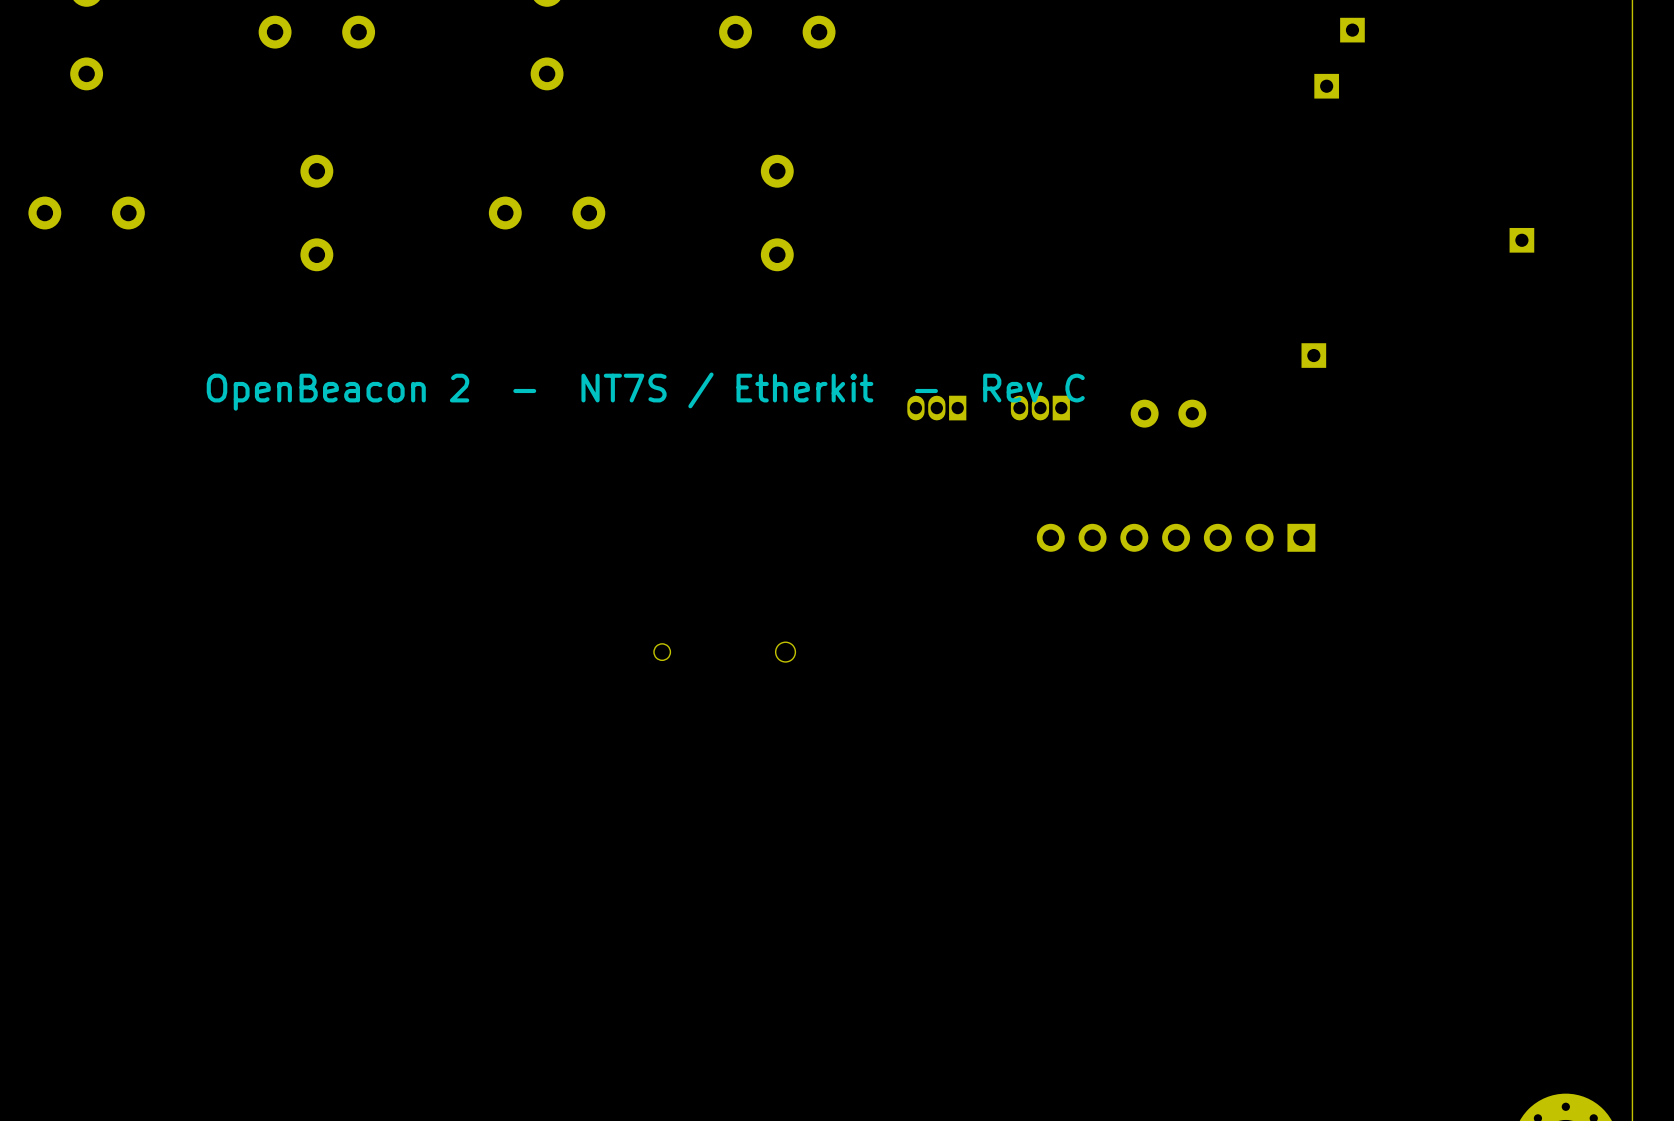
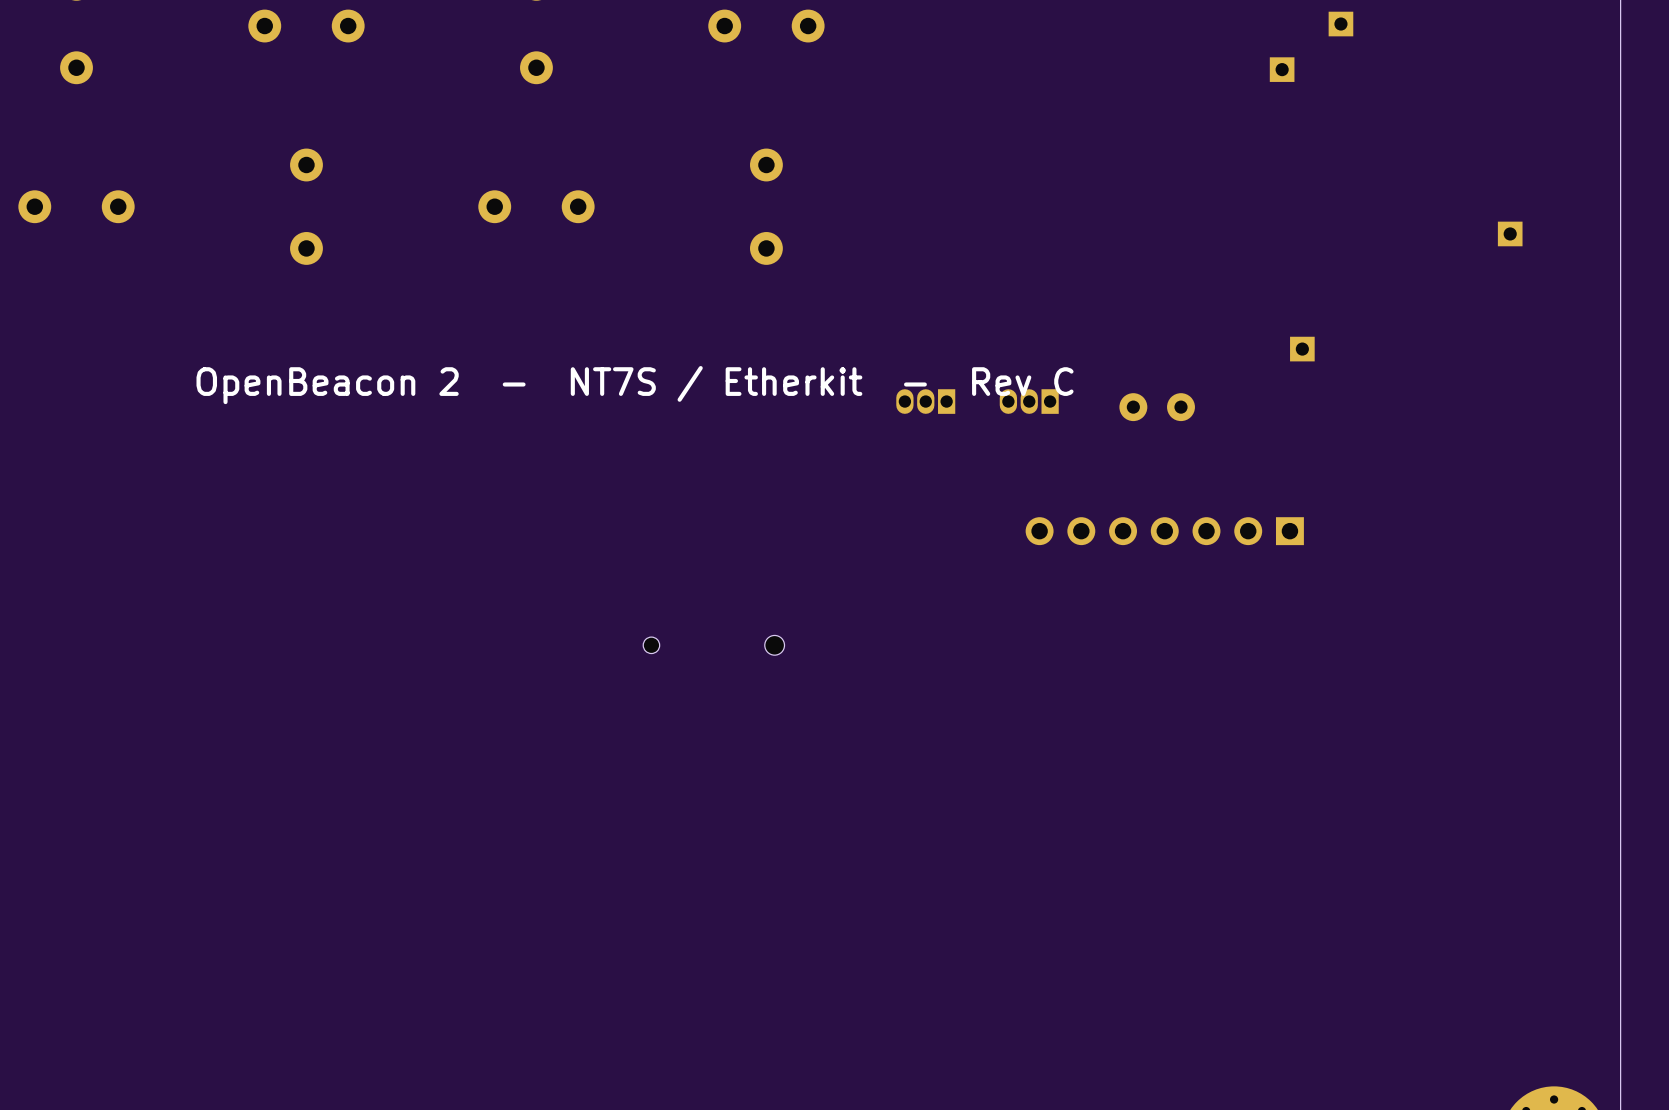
part position: (1326, 86) -> (1282, 69)

